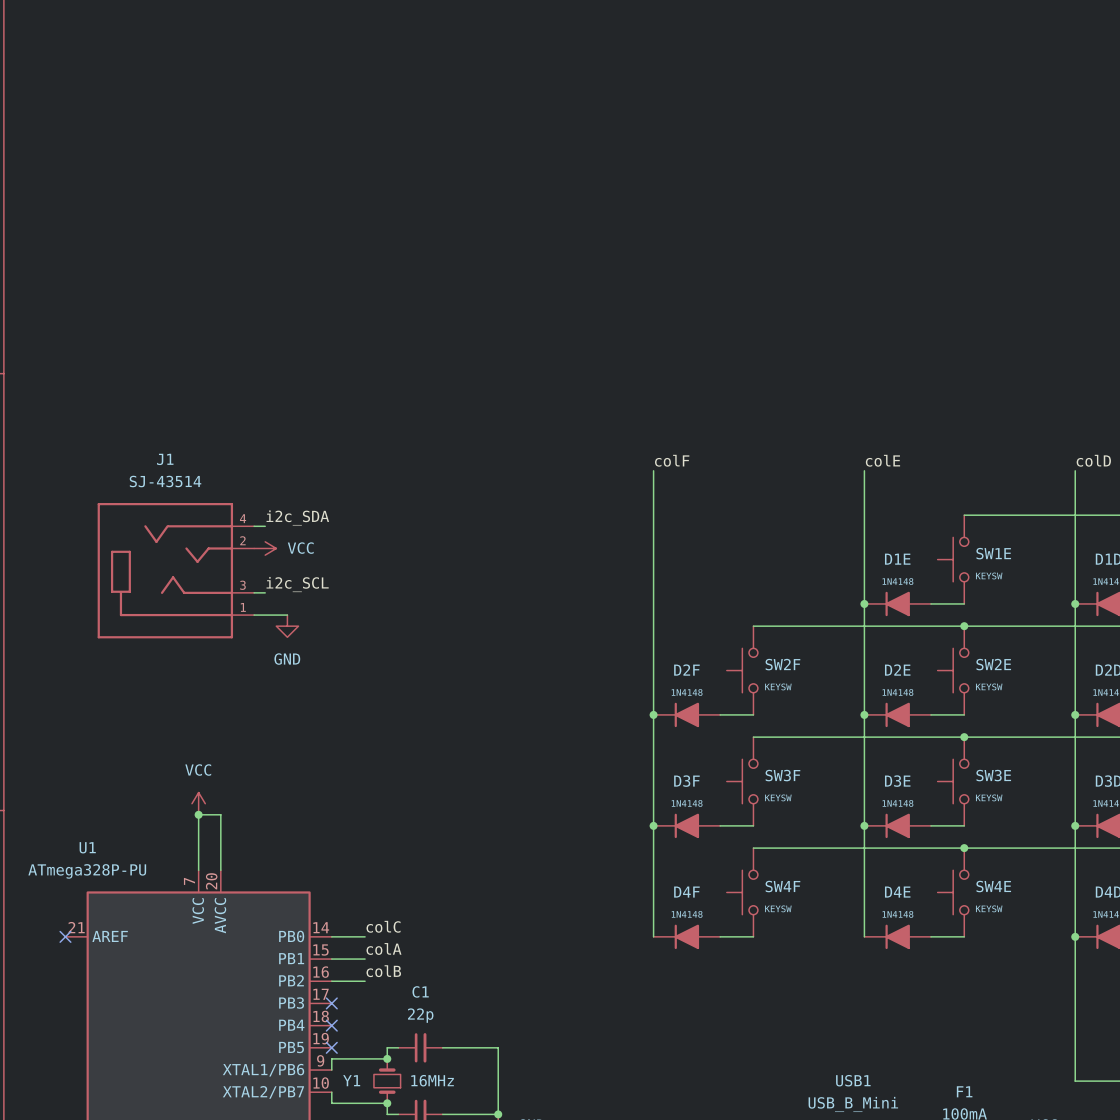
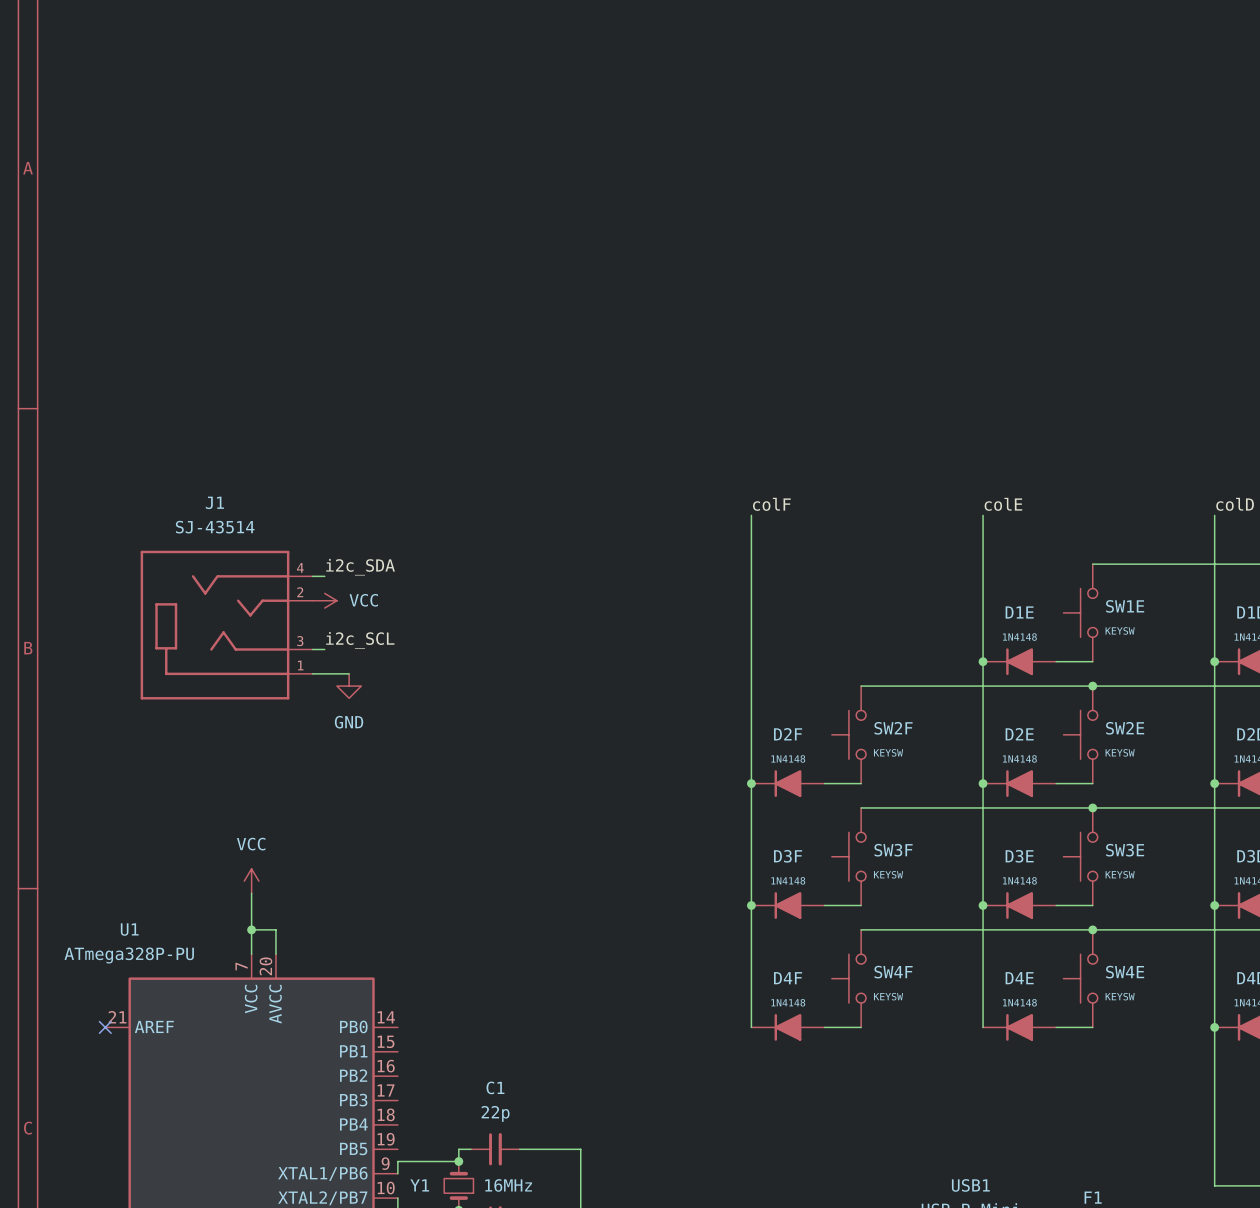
wire: (198, 814) (220, 814) (220, 848) -> (251, 929) (275, 929)
junction position: (198, 814) -> (251, 929)
label: colC (383, 926) -> none
wire: (331, 936) (365, 936) -> none
label: colA (383, 948) -> none
wire: (331, 959) (365, 959) -> none
label: colB (383, 971) -> none
wire: (331, 981) (365, 981) -> none
no-connect mark: (331, 1003) -> none
no-connect mark: (331, 1025) -> none
no-connect mark: (331, 1047) -> none

